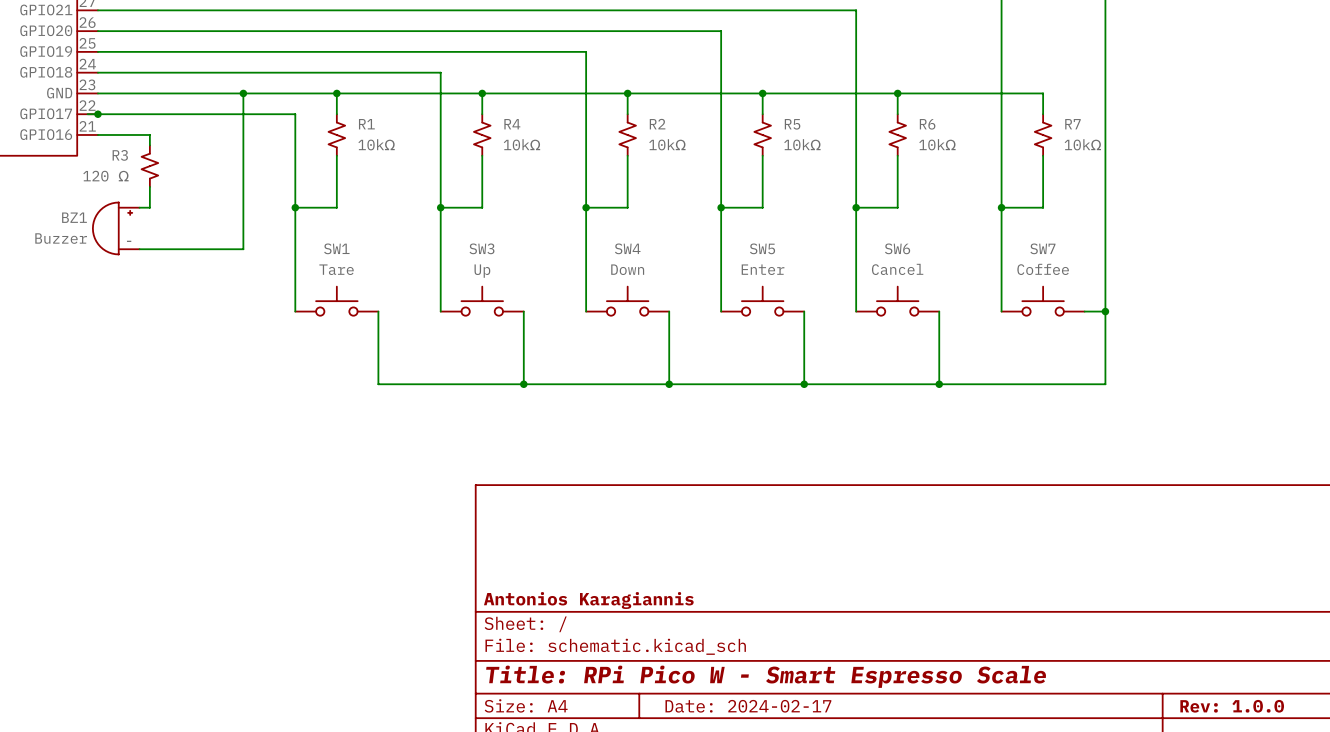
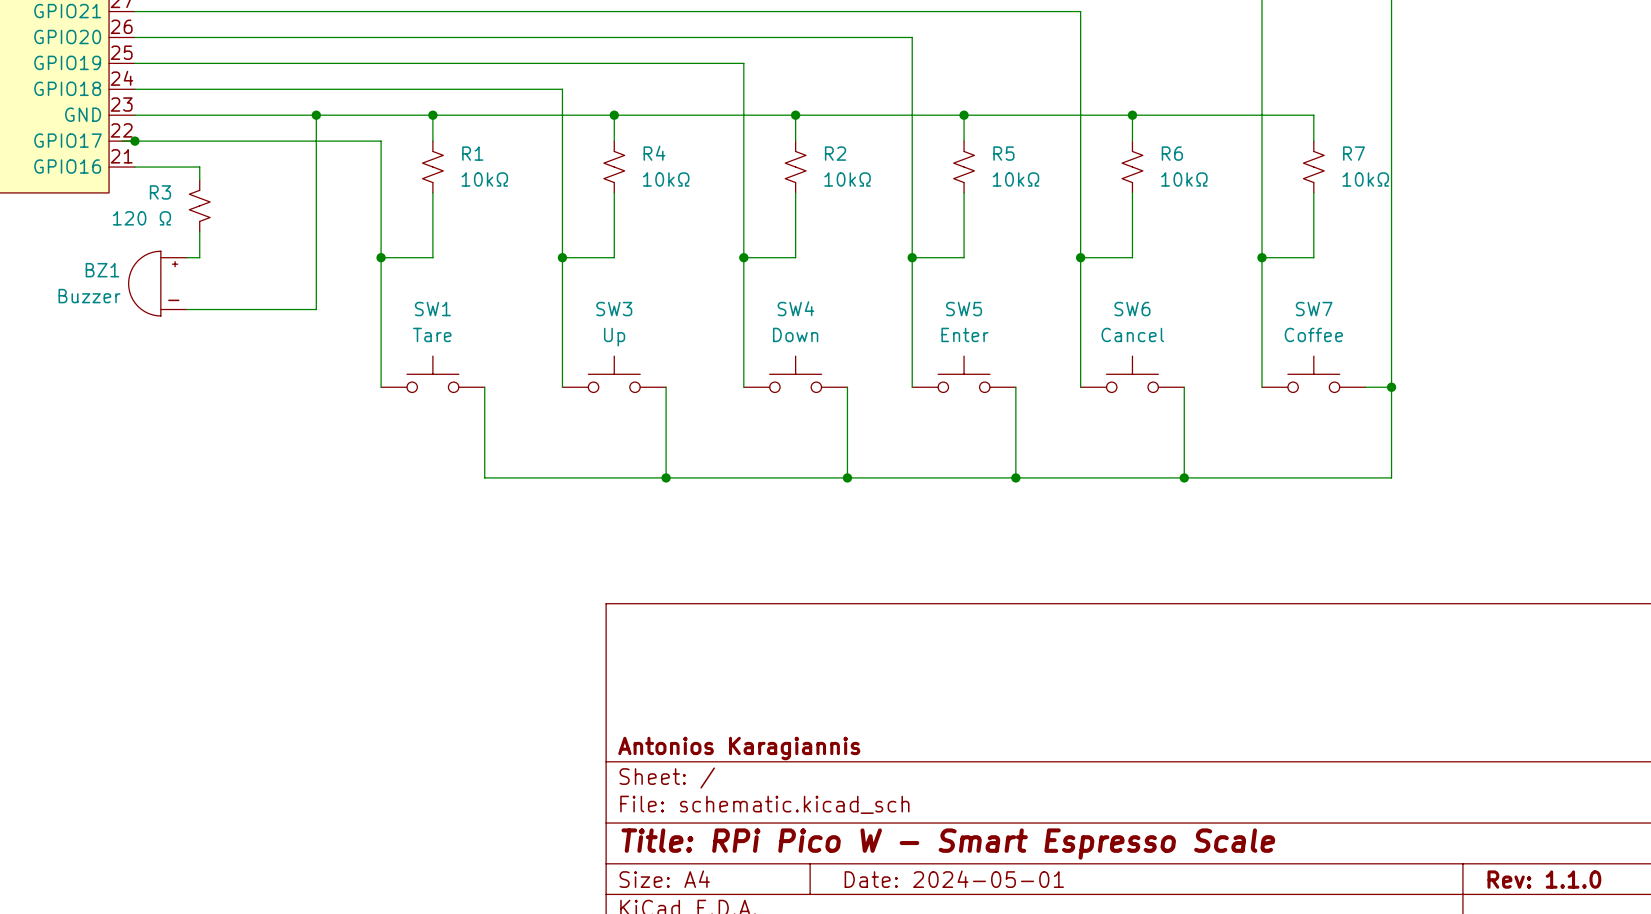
title block: Date: 2024-02-17 (748, 706) -> Date: 2024-05-01 (954, 879)
title block: Rev: 1.0.0 (1232, 706) -> Rev: 1.1.0 (1544, 879)

